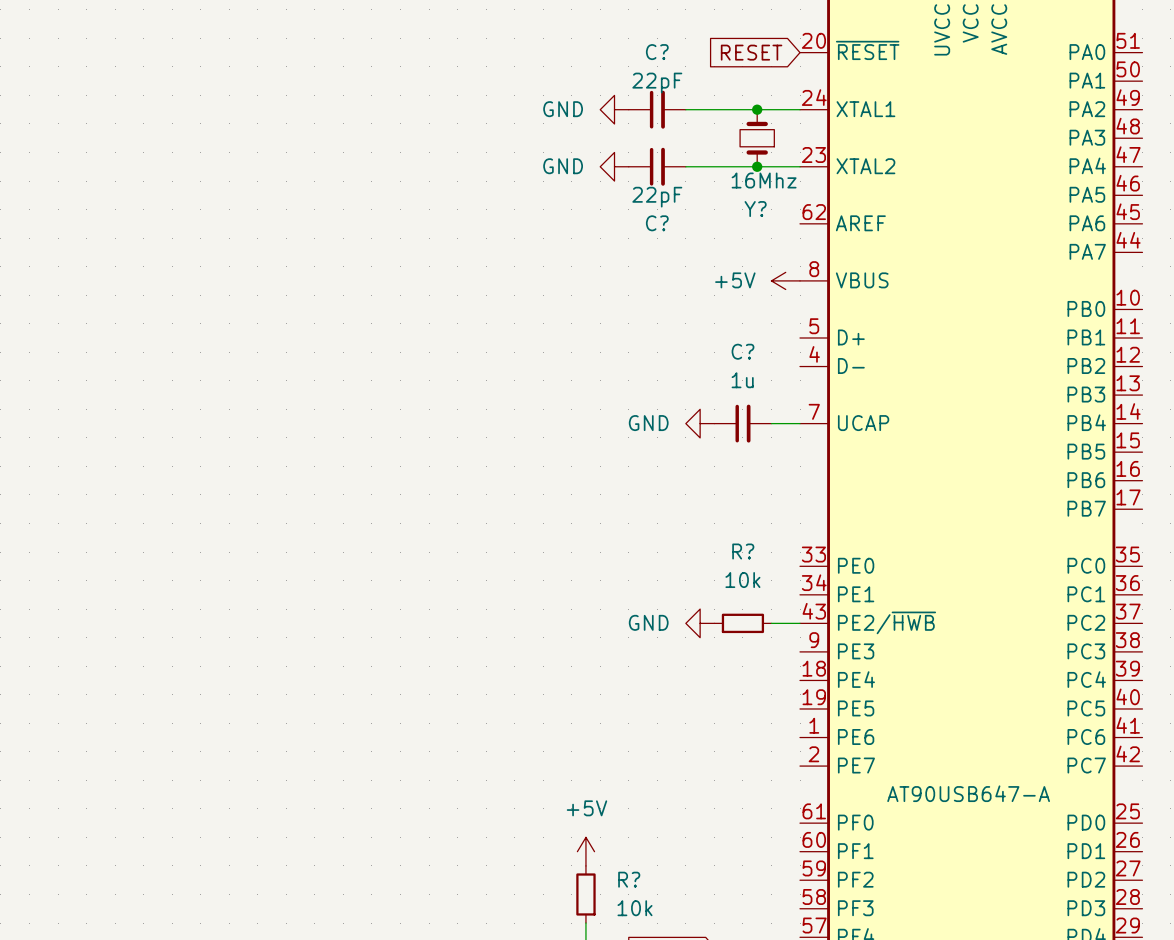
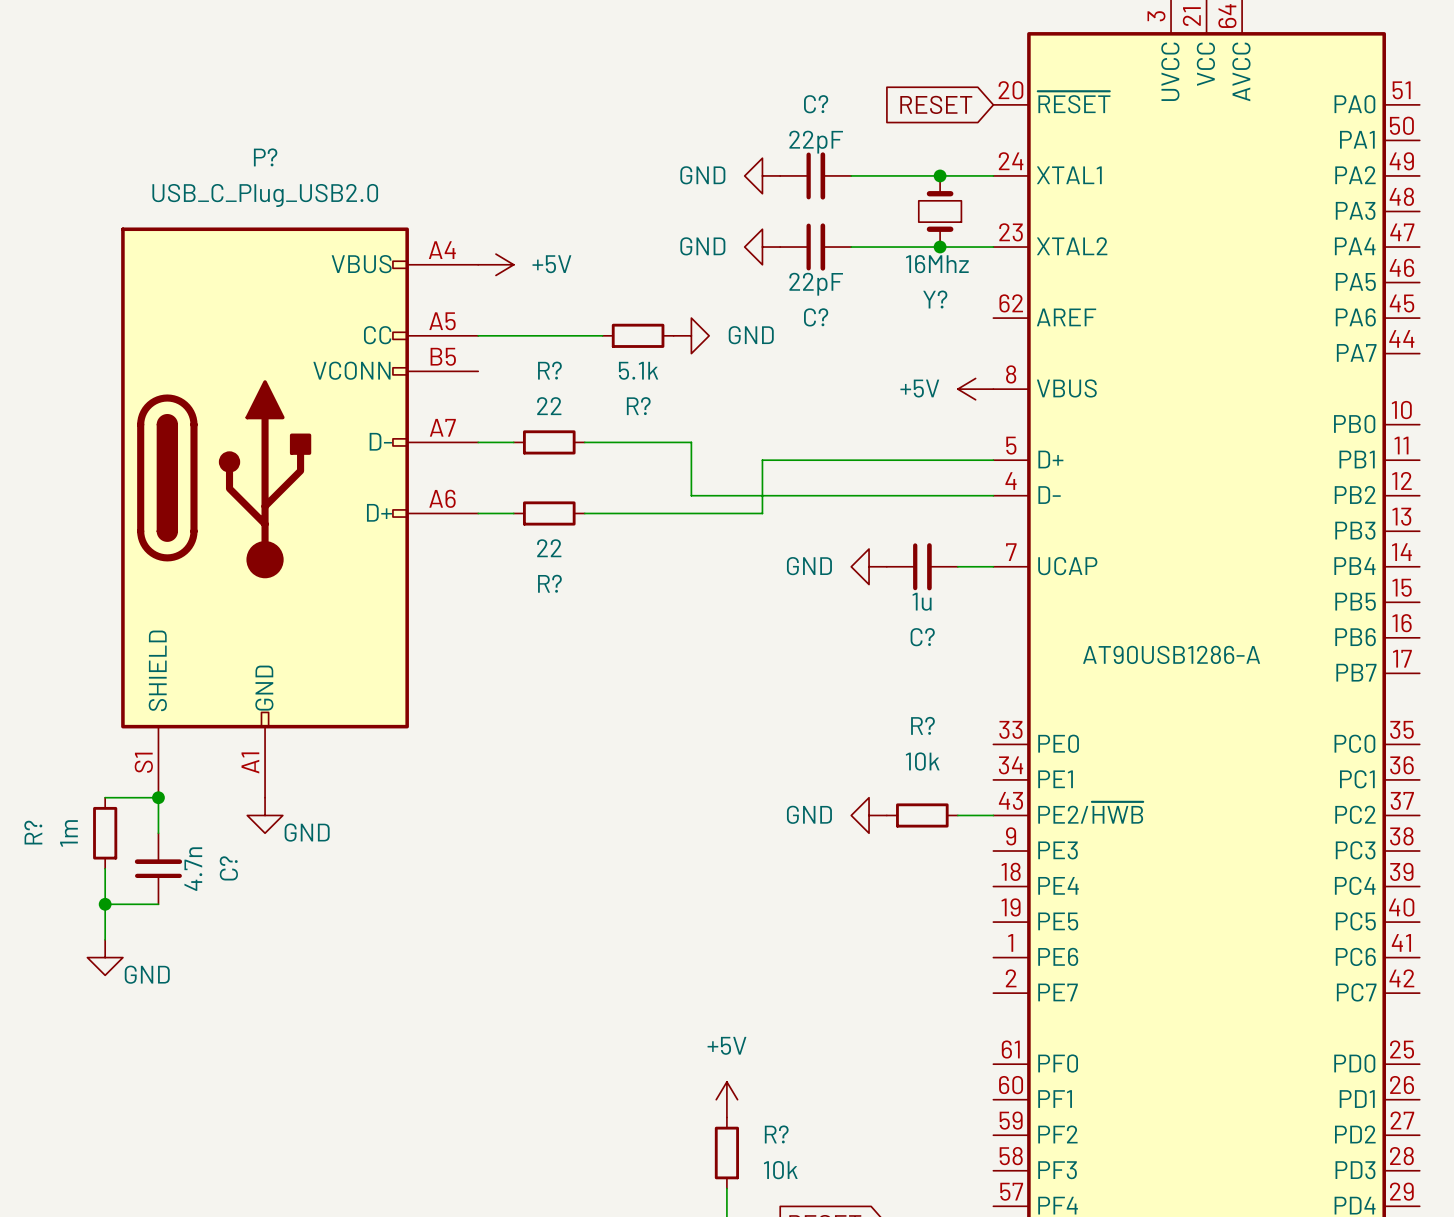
power symbol: none -> +5V (495, 264)
wire: none -> (478, 335) (602, 335)
R?: none -> 5.1k (638, 335)
power symbol: none -> GND (691, 335)
wire: none -> (478, 442) (513, 442)
R?: none -> 22 (549, 442)
wire: none -> (584, 442) (691, 442) (691, 495) (993, 495)
wire: none -> (993, 460) (762, 460) (762, 513) (584, 513)
C? name position: C? (743, 351) -> C? (922, 637)
P?: none -> USB_C_Plug_USB2.0 (299, 512)
wire: none -> (478, 513) (513, 513)
R?: none -> 22 (549, 513)
C? value position: 1u (742, 380) -> 1u (922, 601)
wire: none -> (105, 797) (158, 797) (158, 833)
junction: none -> (158, 797)
power symbol: none -> GND (265, 815)
R?: none -> 1m (105, 833)
wire: none -> (105, 868) (105, 939)
C?: none -> 4.7n (158, 868)
wire: none -> (105, 904) (158, 904)
junction: none -> (105, 904)
power symbol: none -> GND (105, 957)
part value: AT90USB647-A (968, 793) -> AT90USB1286-A (1171, 654)

